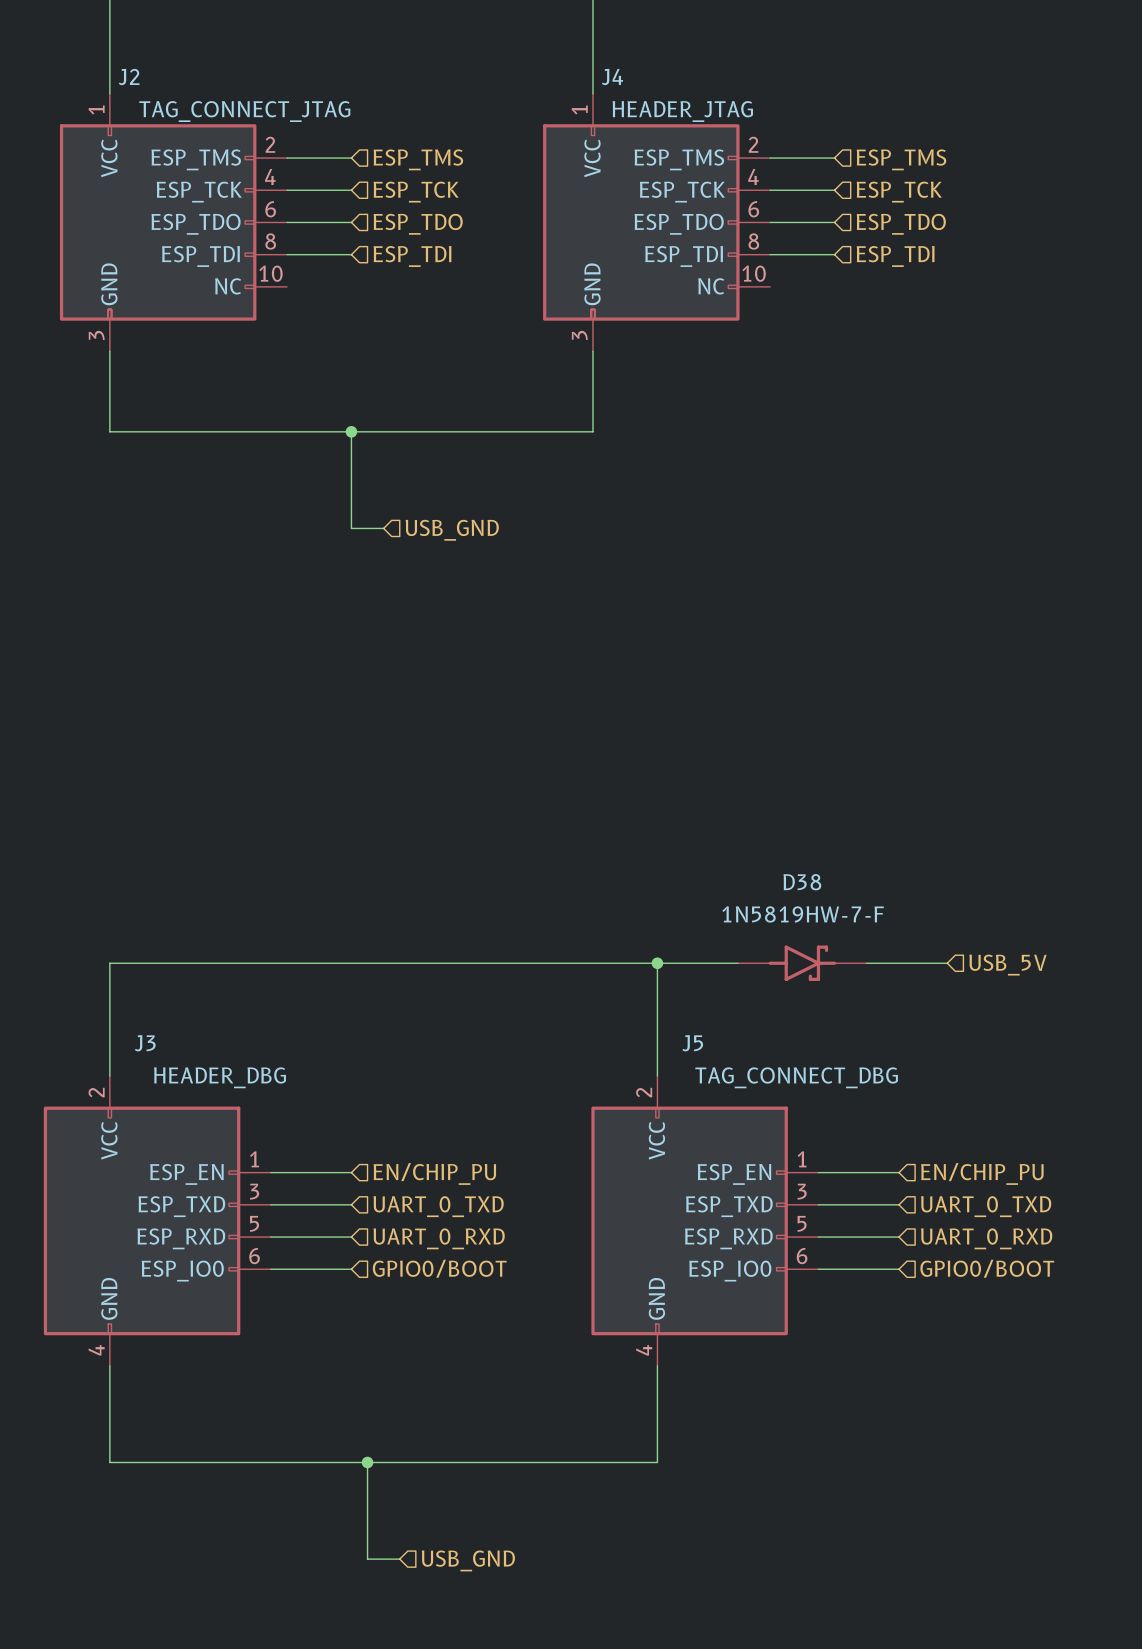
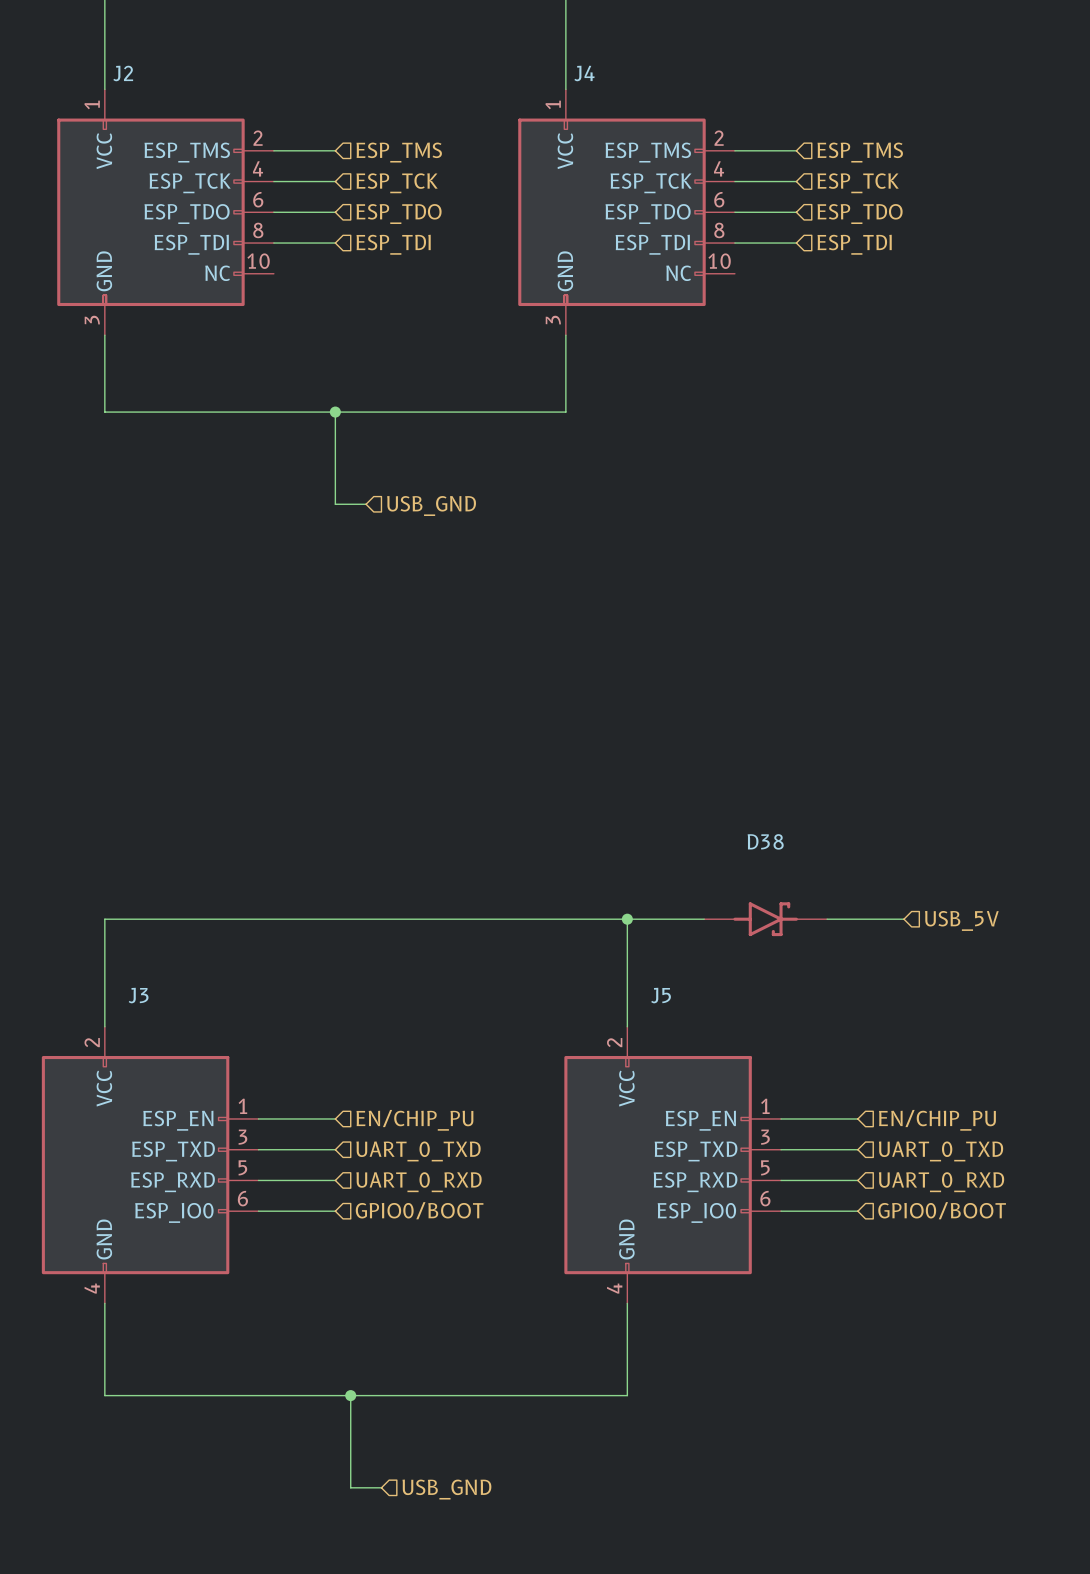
J2 value: TAG_CONNECT_JTAG (244, 111) -> none
J4 value: HEADER_JTAG (682, 111) -> none
D38 value: 1N5819HW-7-F (803, 914) -> none
J3 value: HEADER_DBG (220, 1077) -> none
J5 value: TAG_CONNECT_DBG (796, 1077) -> none

